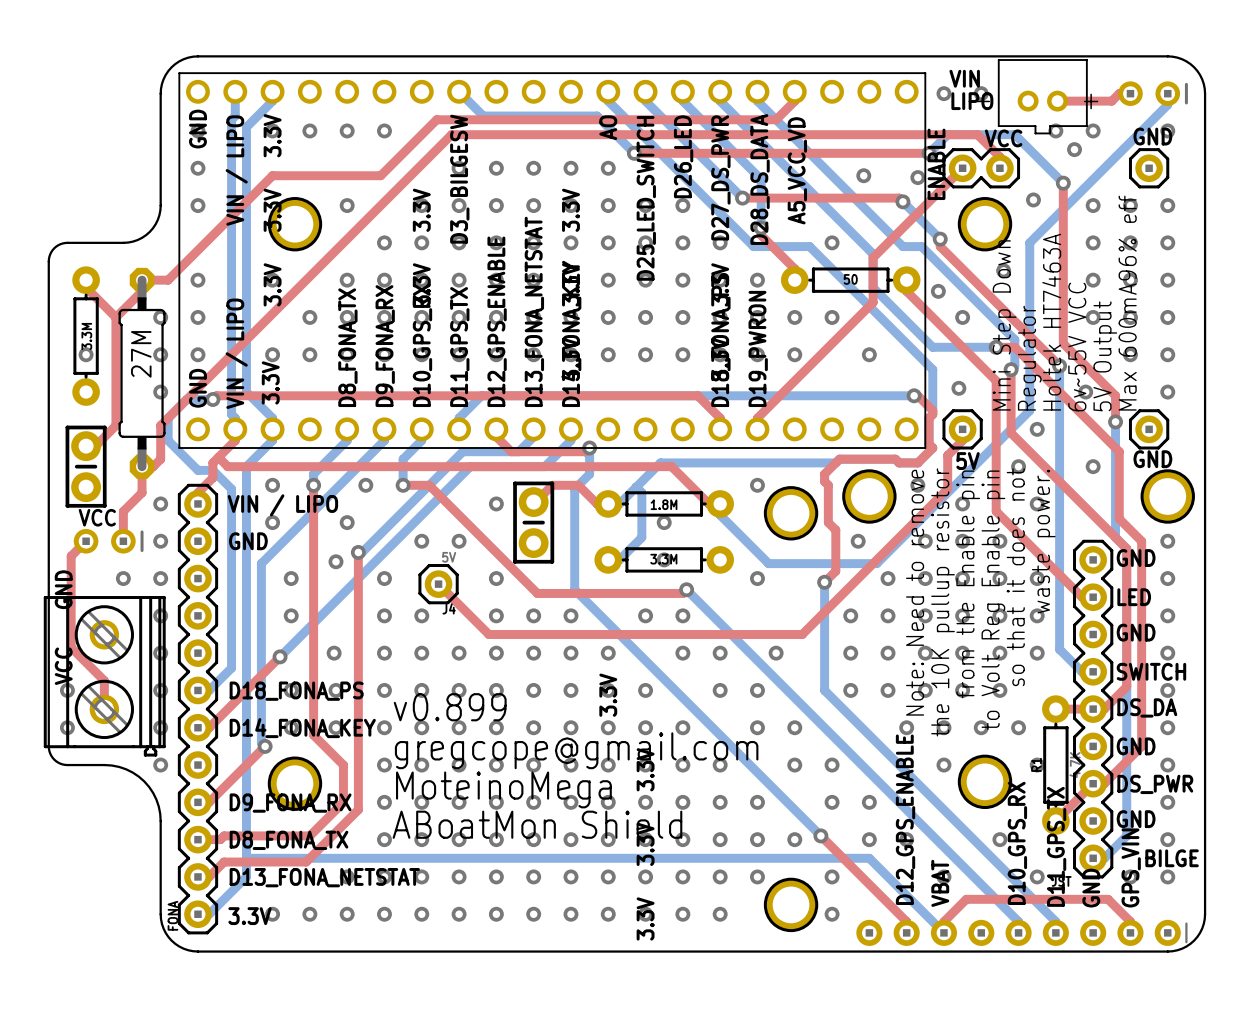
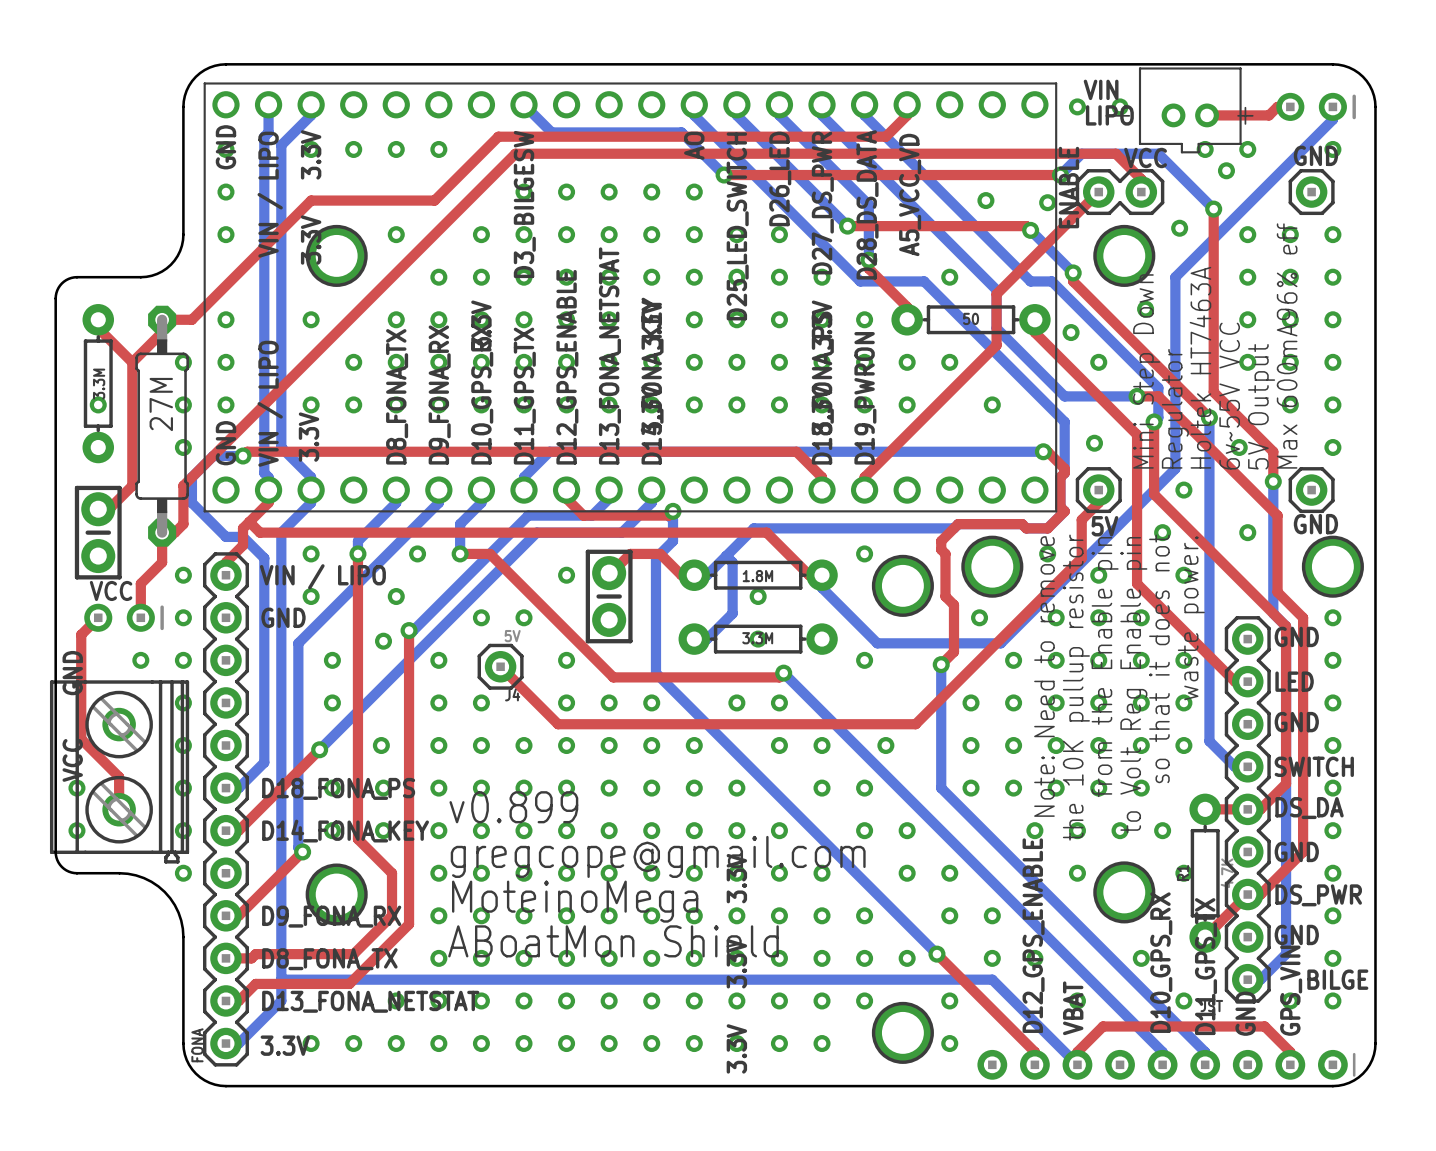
text: 3.3V (421, 210) -> none
text: 3.3V (570, 210) -> none
text: 3.3V (272, 284) -> none
text: 3.3V (608, 695) -> none

